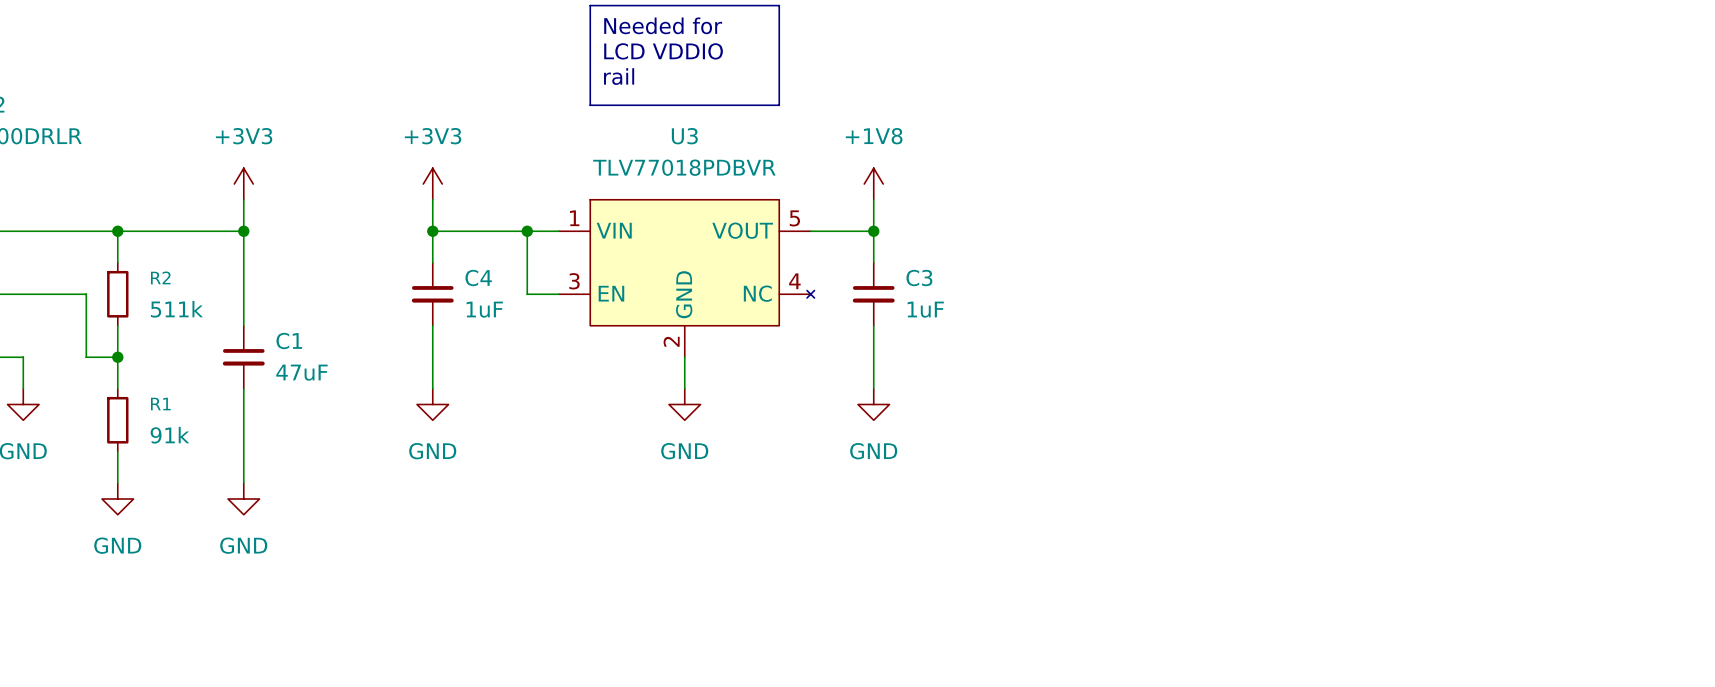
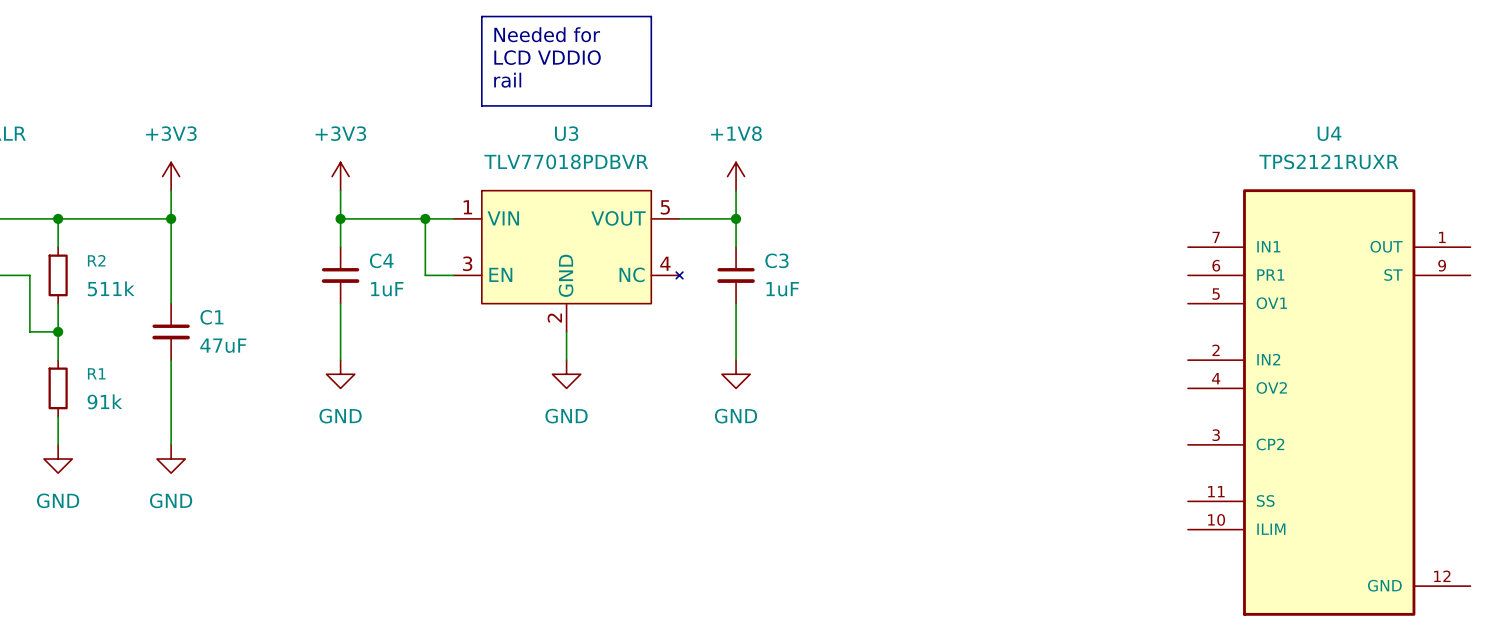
U4: none -> TPS2121RUXR (1329, 402)

